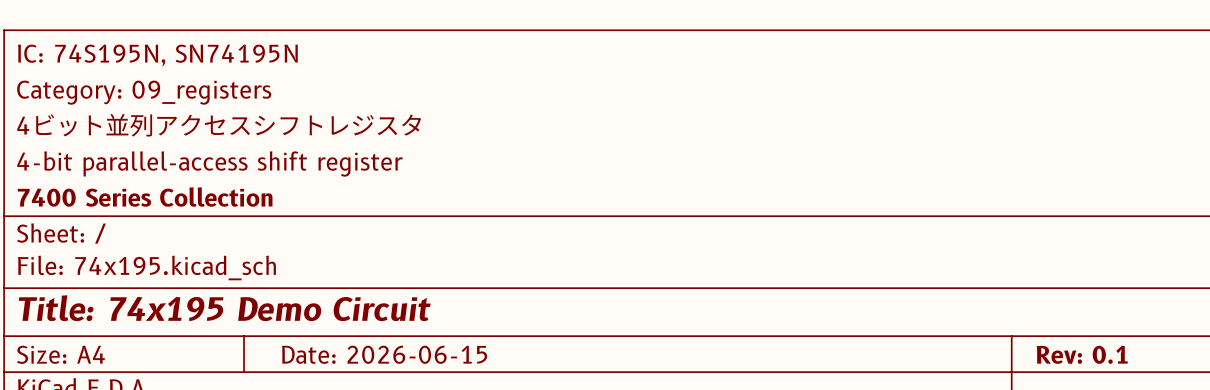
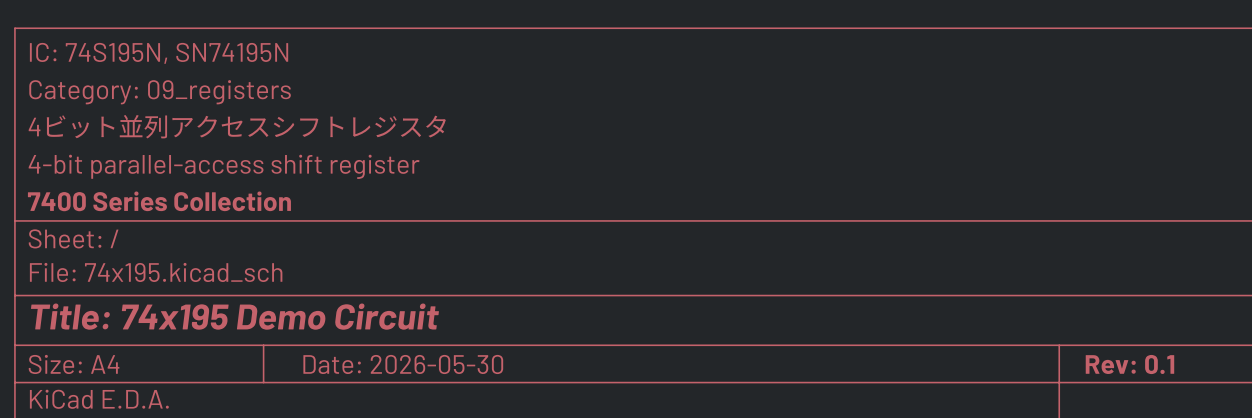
title block: Date: 2026-06-15 (384, 354) -> Date: 2026-05-30 (403, 364)

